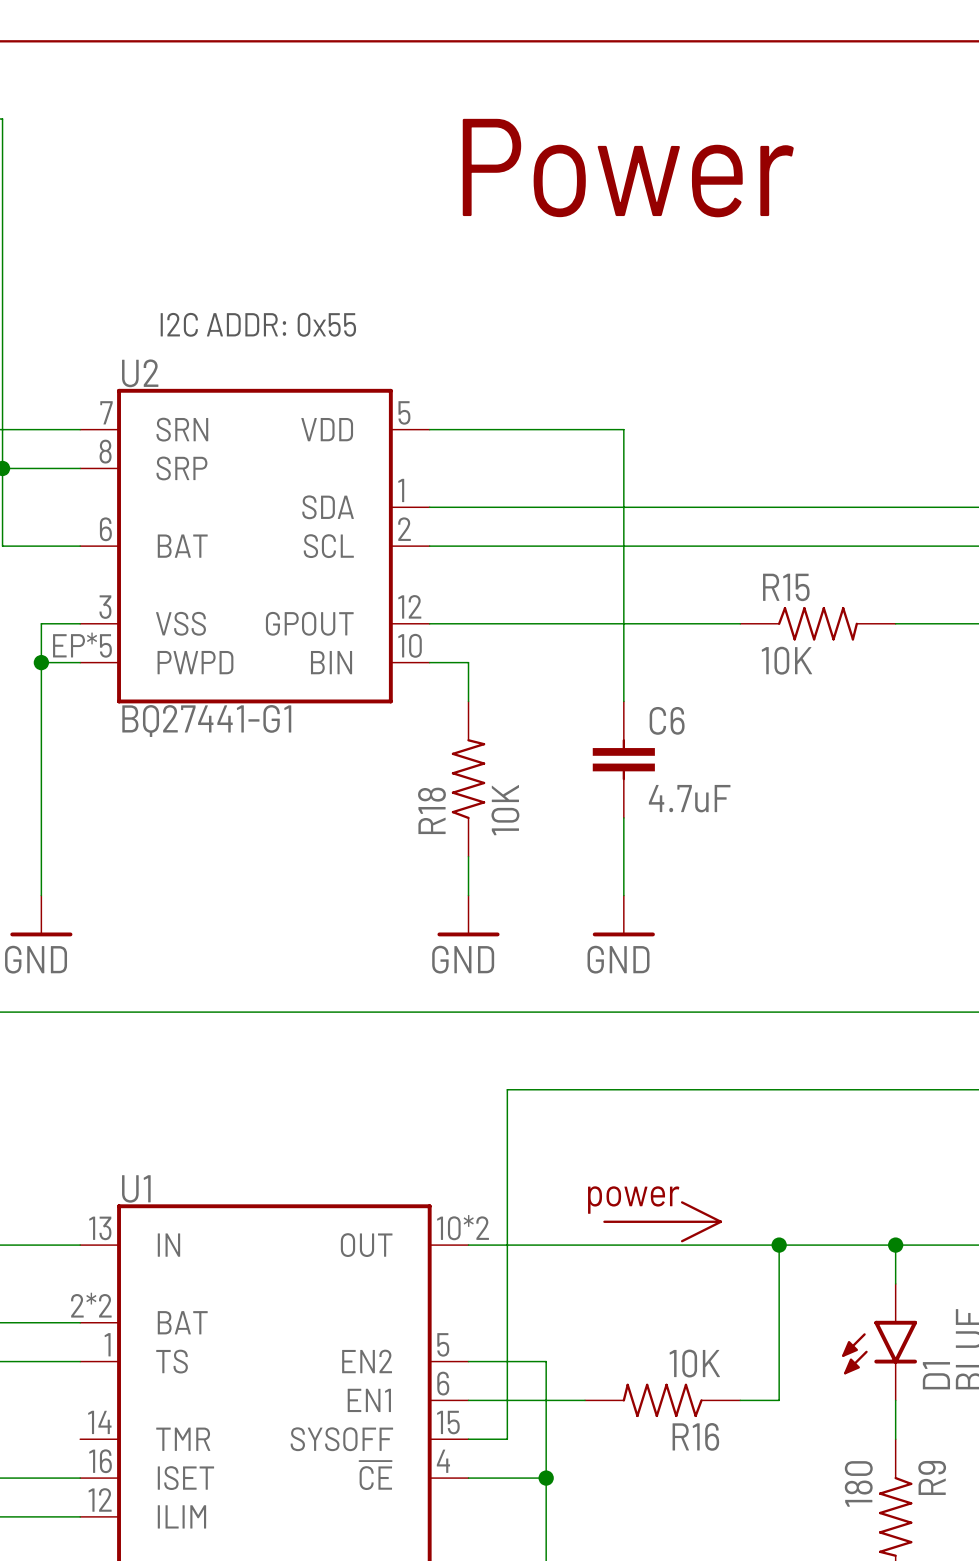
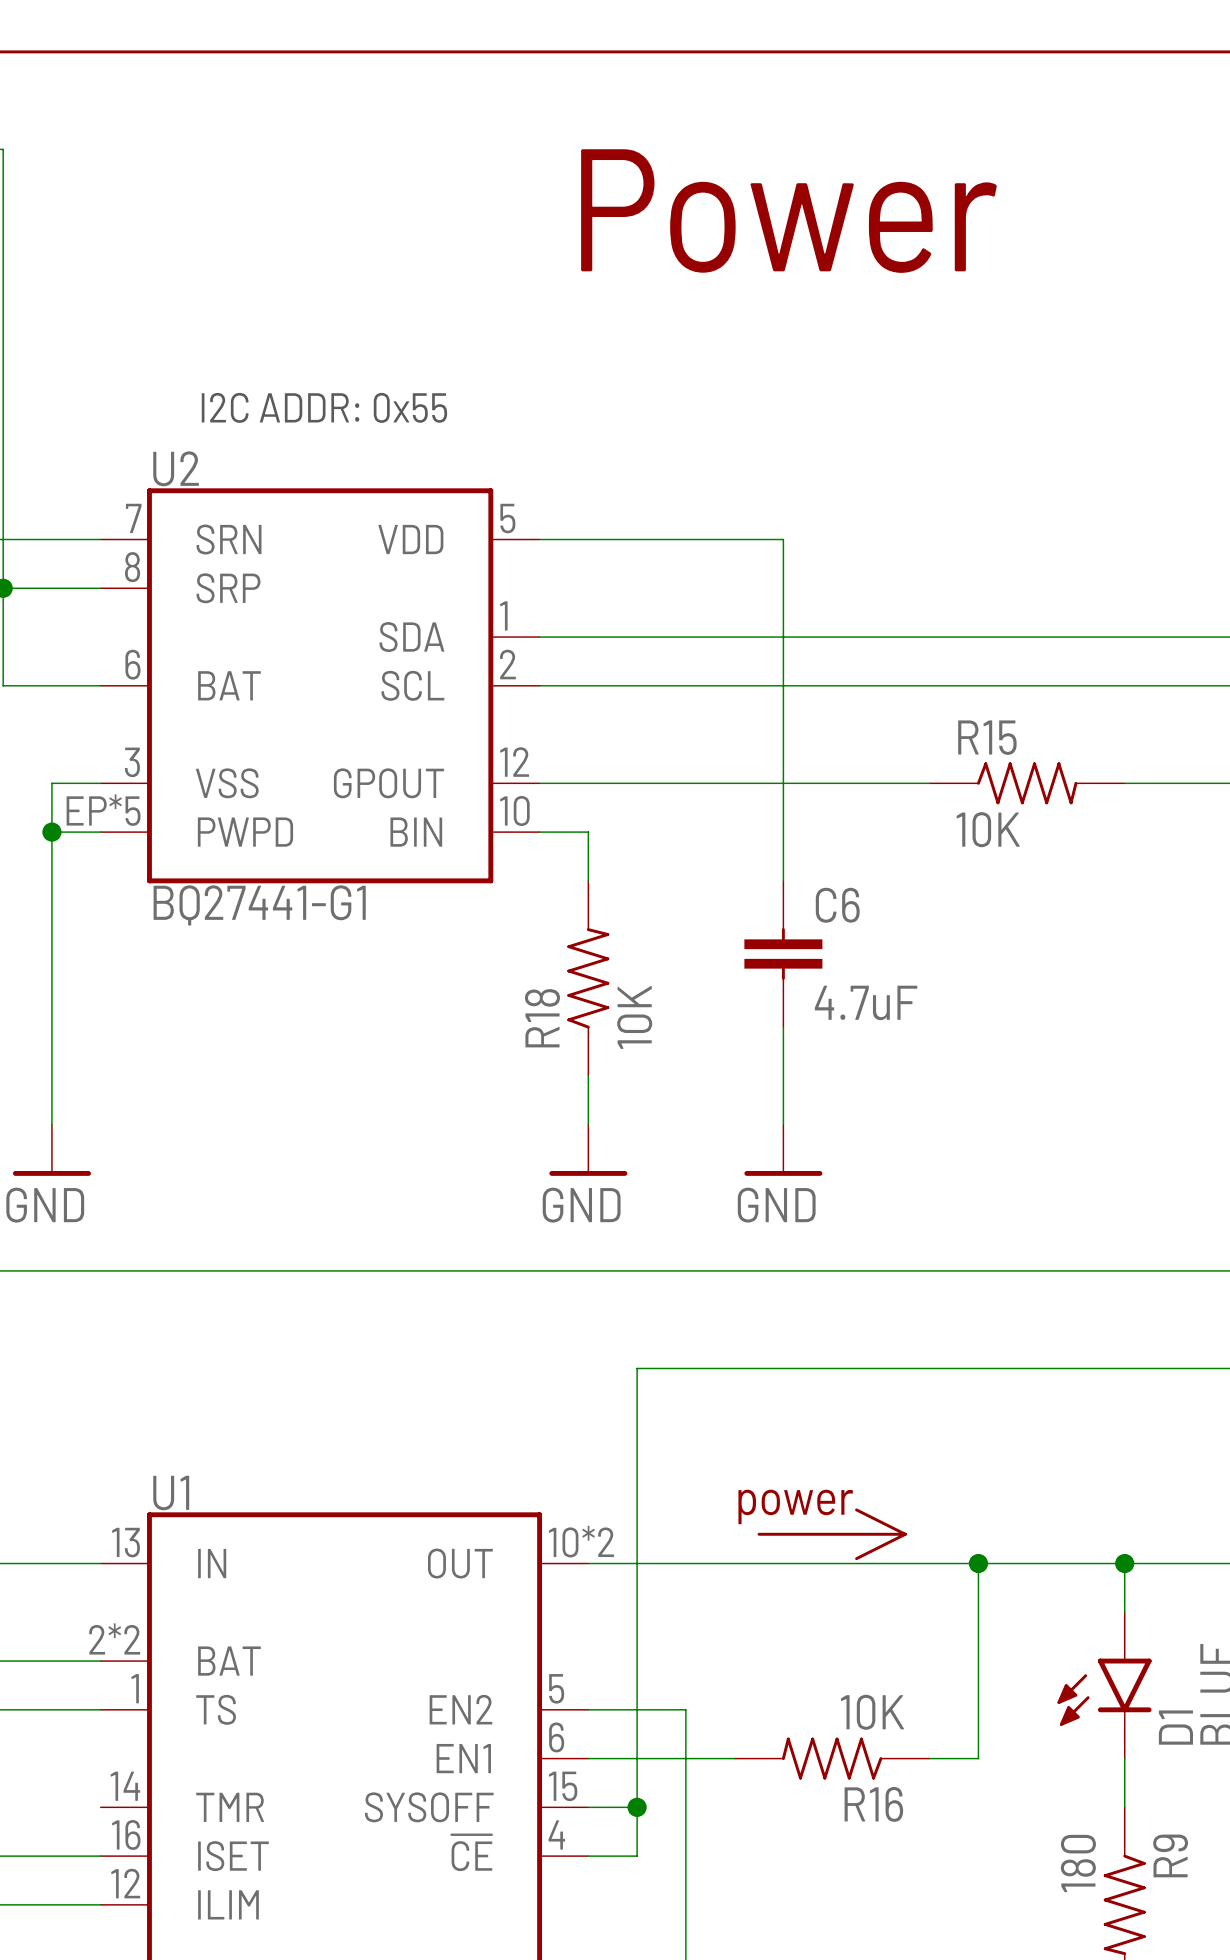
wire: (507, 1478) (546, 1478) -> (637, 1856) (637, 1807)
junction position: (546, 1478) -> (637, 1807)

